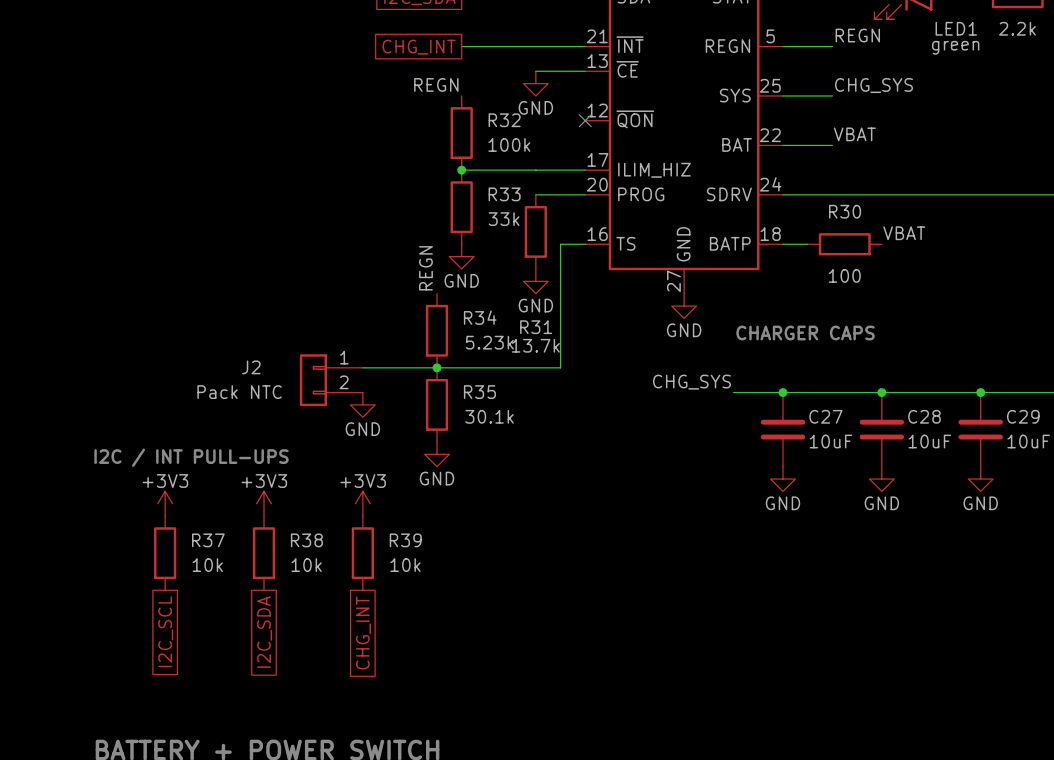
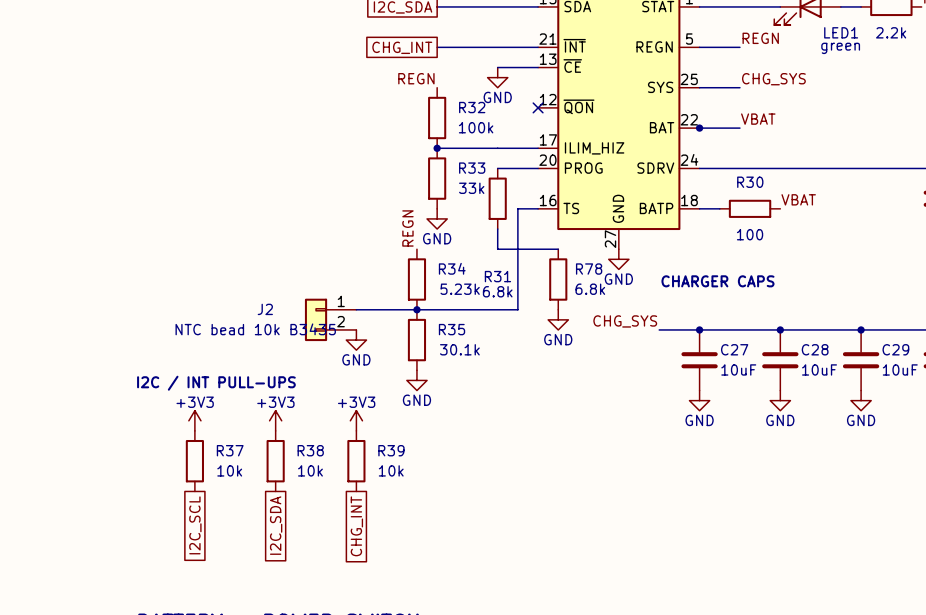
junction: none -> (699, 128)
wire: none -> (497, 229) (497, 249) (558, 249)
power symbol position: GND (535, 281) -> GND (558, 319)
R78: none -> 6.8k (558, 279)
R31 value: 13.7k (535, 345) -> 6.8k (497, 291)
J2 value: Pack NTC (239, 392) -> NTC bead 10k B3435 (255, 329)

